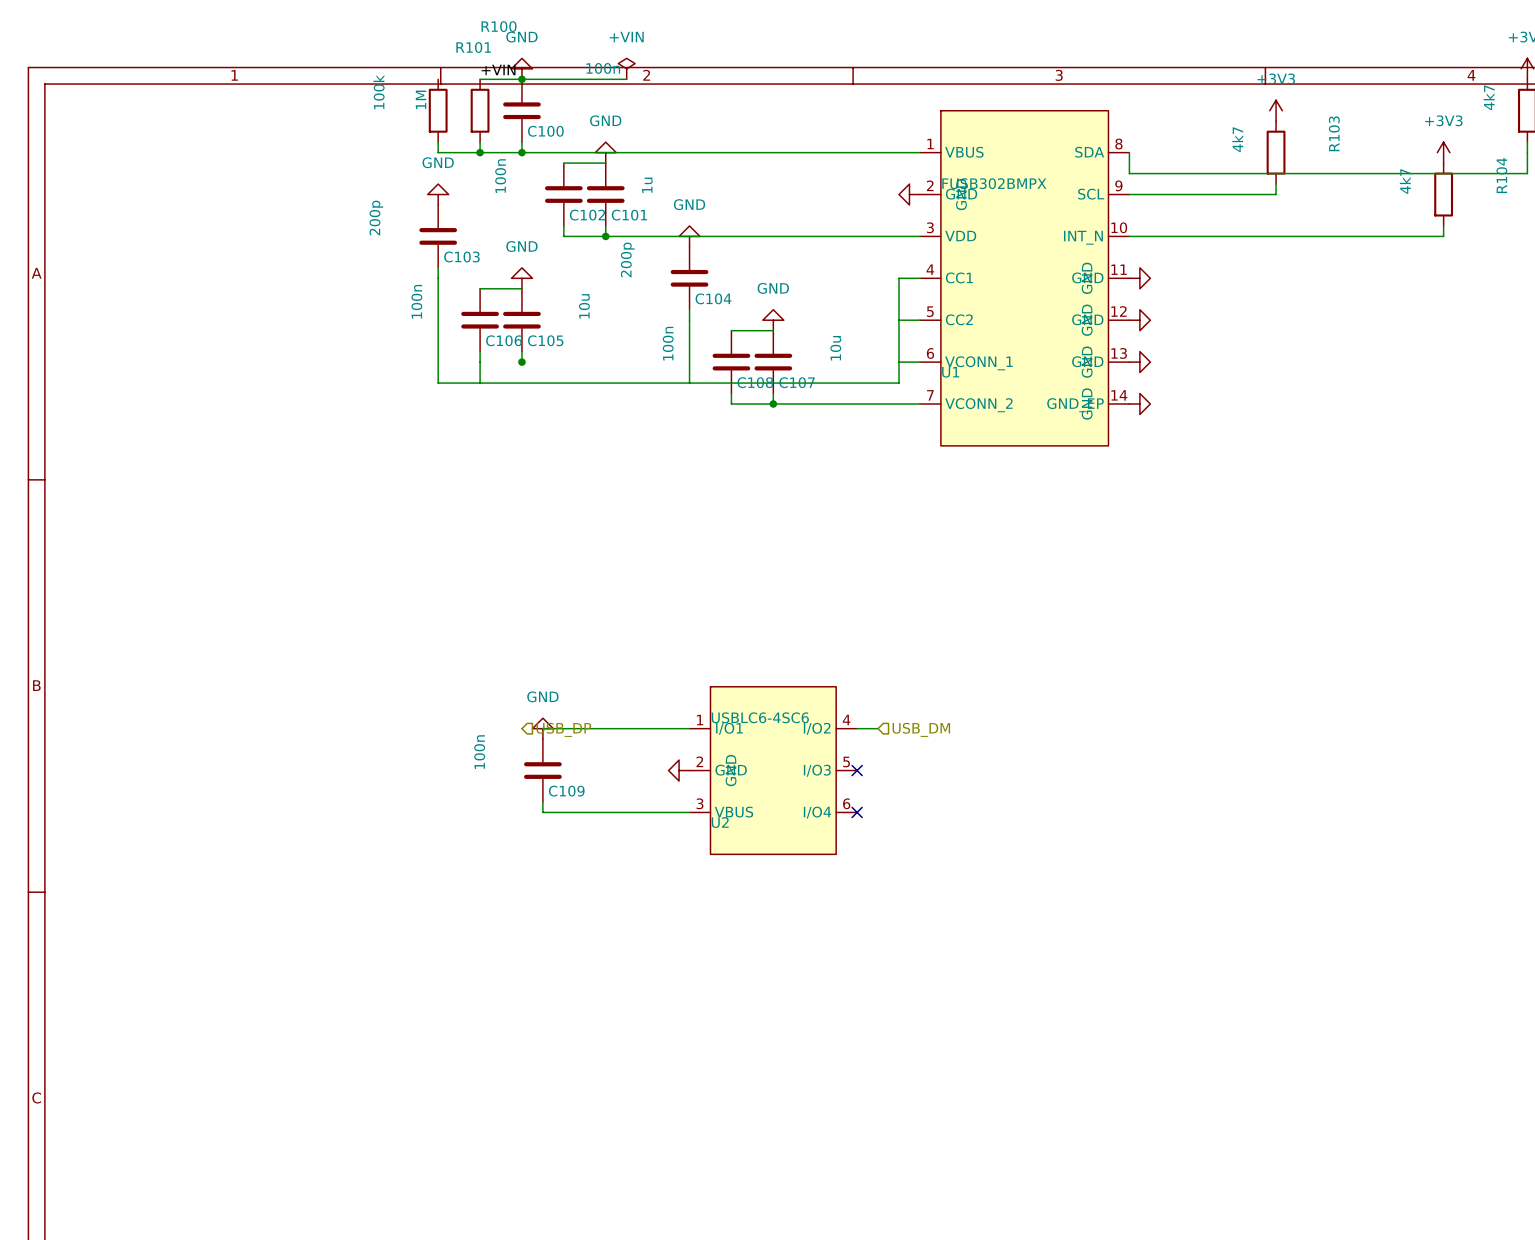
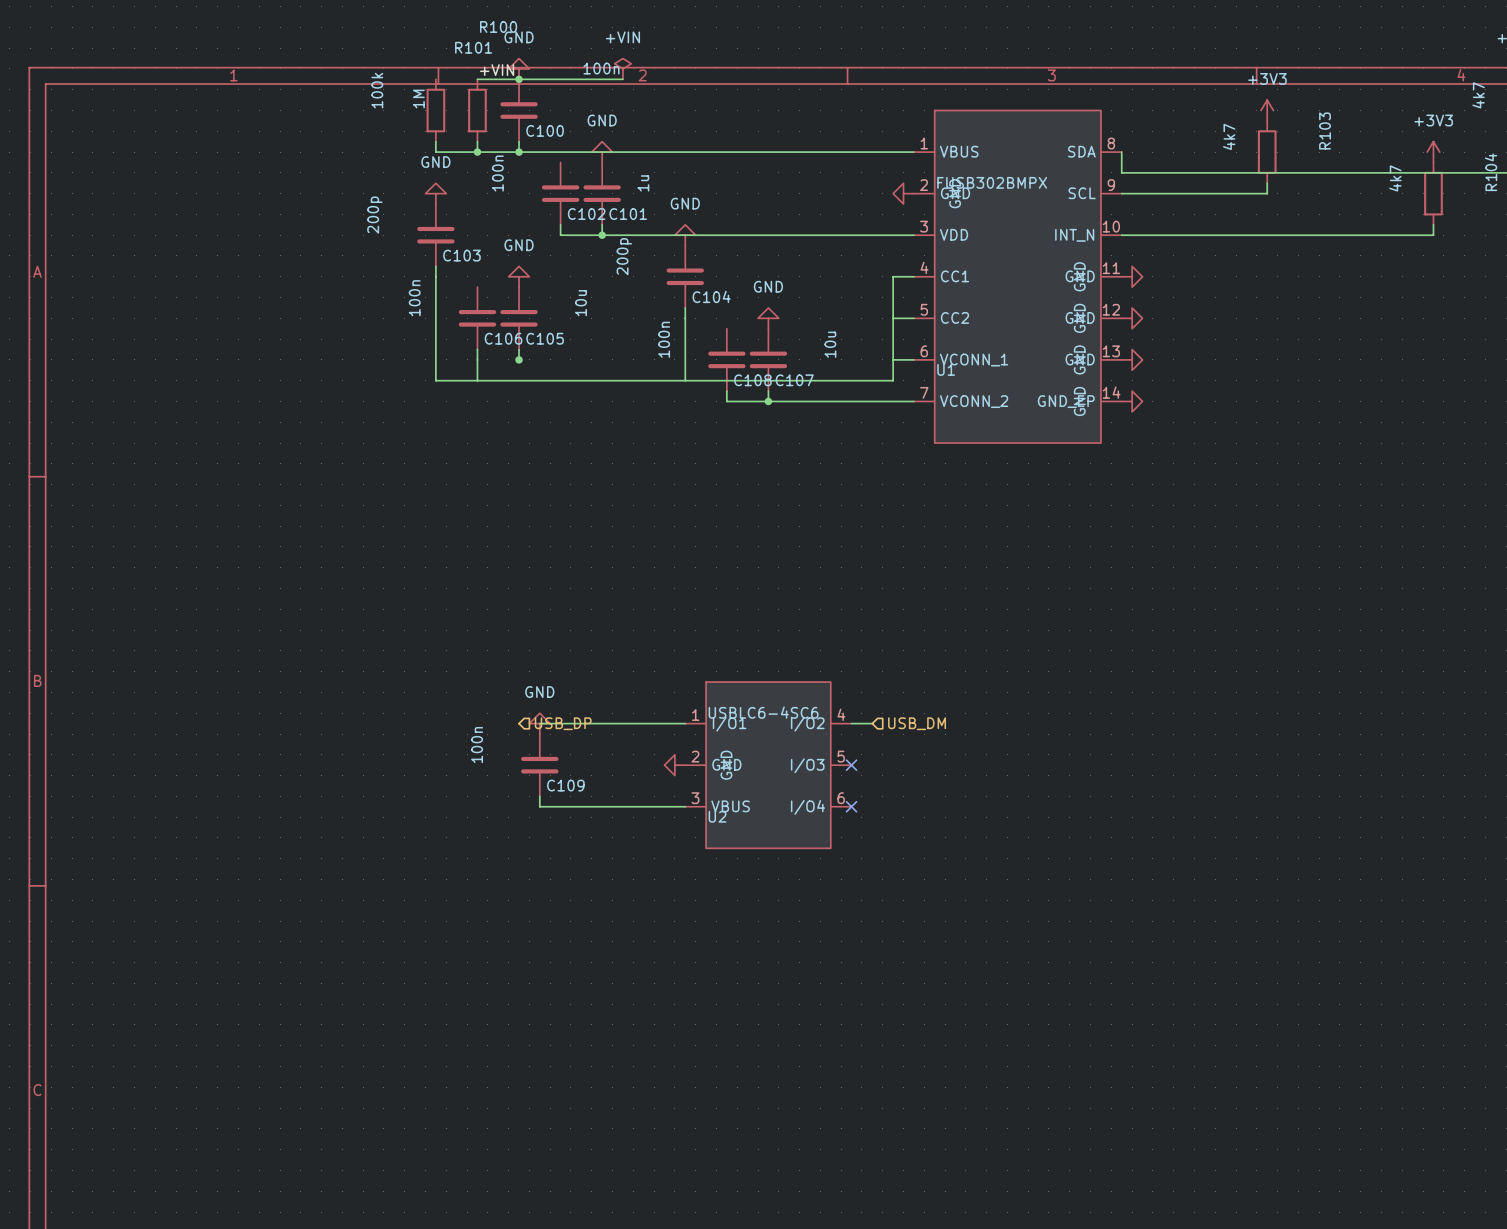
wire: (563, 163) (605, 163) -> none
wire: (480, 288) (521, 288) -> none
wire: (731, 330) (773, 330) -> none

